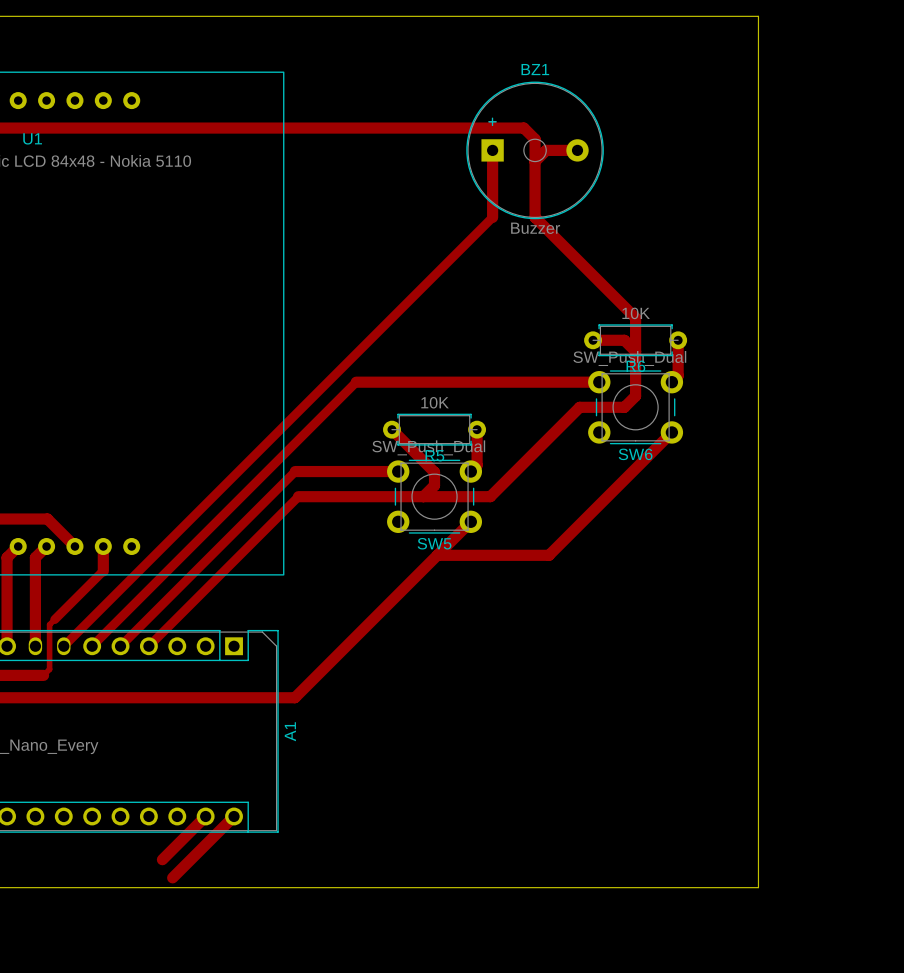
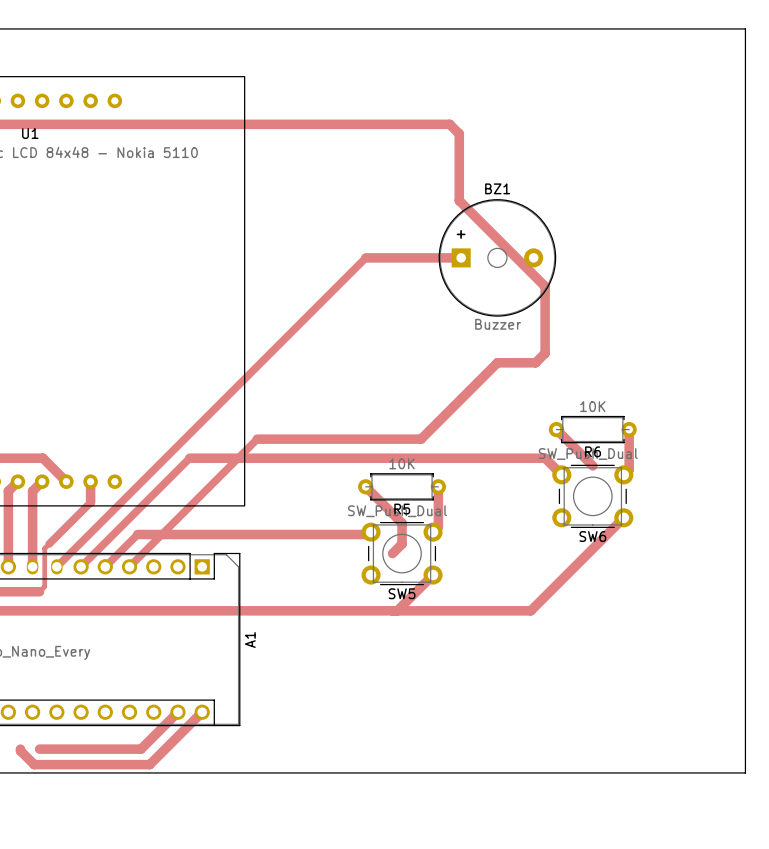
board edge: (758, 16) (758, 887) -> (650, 28) (745, 28) (745, 772) (650, 772)
top track: (492, 150) (492, 217) (425, 284) -> (461, 257) (365, 257)
BZ1 position: (535, 150) -> (497, 257)
top track: (577, 150) (546, 150) (535, 161) -> none
top track: (593, 340) (624, 340) (635, 351) -> none
R6 position: (635, 340) -> (592, 429)
top track: (678, 340) (678, 375) (671, 382) -> none
top track: (599, 382) (356, 382) (219, 519) -> (561, 474) (545, 458) (189, 458)
SW6 position: (635, 407) -> (592, 496)
top track: (391, 429) (434, 472) (434, 485) (423, 496) -> none
R5 position: (434, 429) -> (402, 486)
top track: (477, 429) (477, 465) (470, 471) -> none
top track: (671, 432) (549, 555) (437, 555) -> none
top track: (398, 471) (295, 471) (158, 608) -> (371, 532) (368, 534) (137, 534)
top track: none -> (556, 429) (592, 465)
top track: none -> (629, 429) (629, 469) (623, 474)
SW5 position: (434, 496) -> (402, 553)
top track: (470, 521) (294, 697) -> (623, 517) (530, 610) (254, 610)
top track: none -> (365, 486) (402, 523) (402, 544) (392, 553)
top track: none -> (438, 486) (438, 526) (433, 532)
top track: none -> (433, 575) (397, 610)
top track: none -> (20, 749) (34, 764) (149, 764)
top track: none -> (39, 749) (141, 749)

